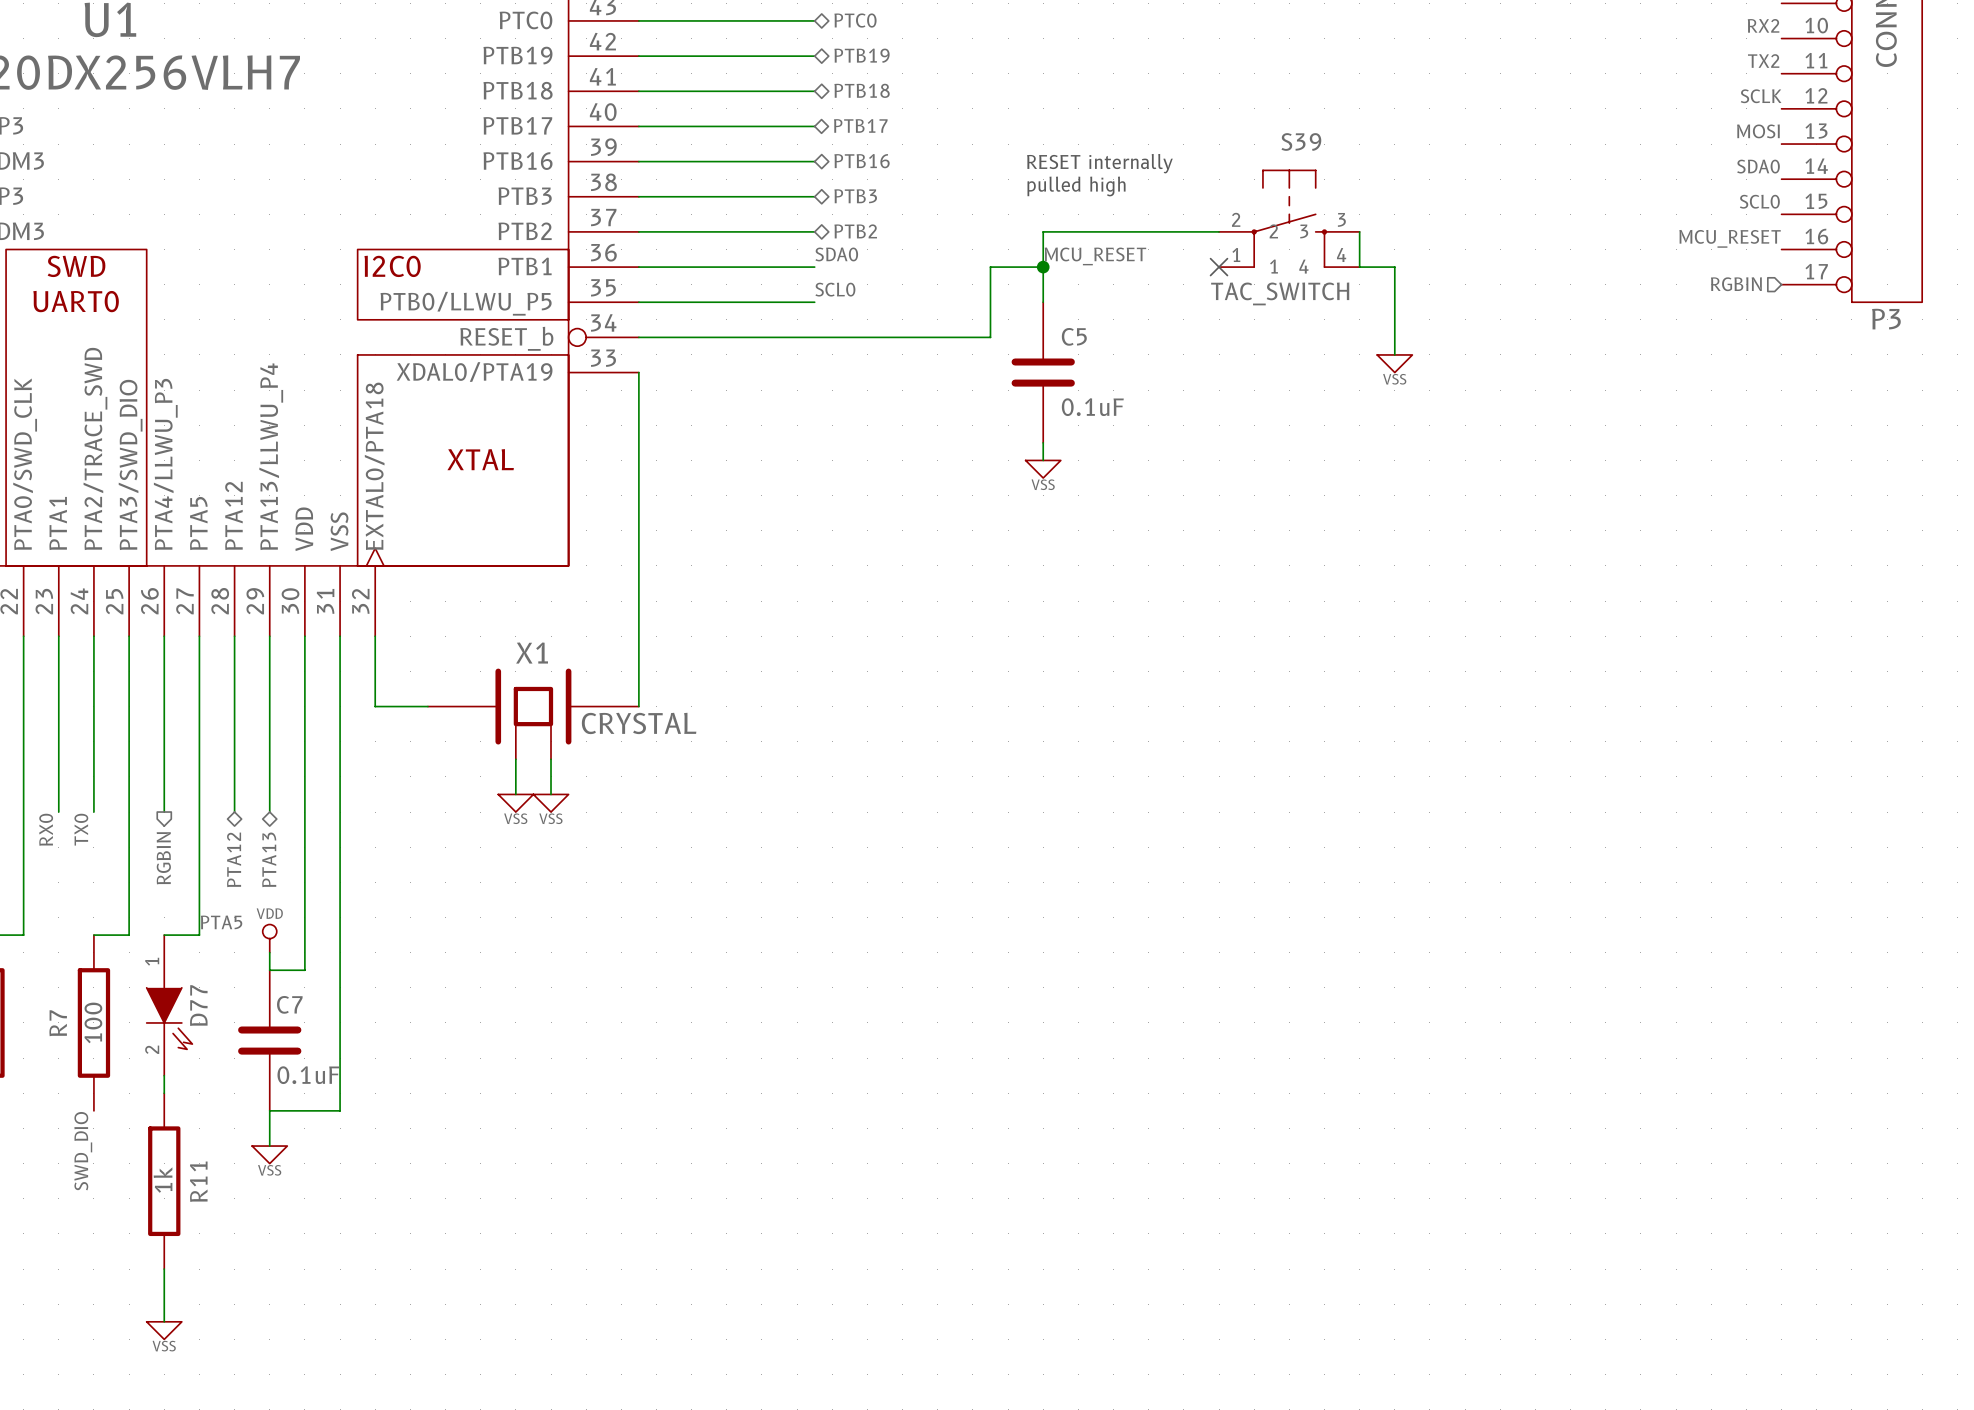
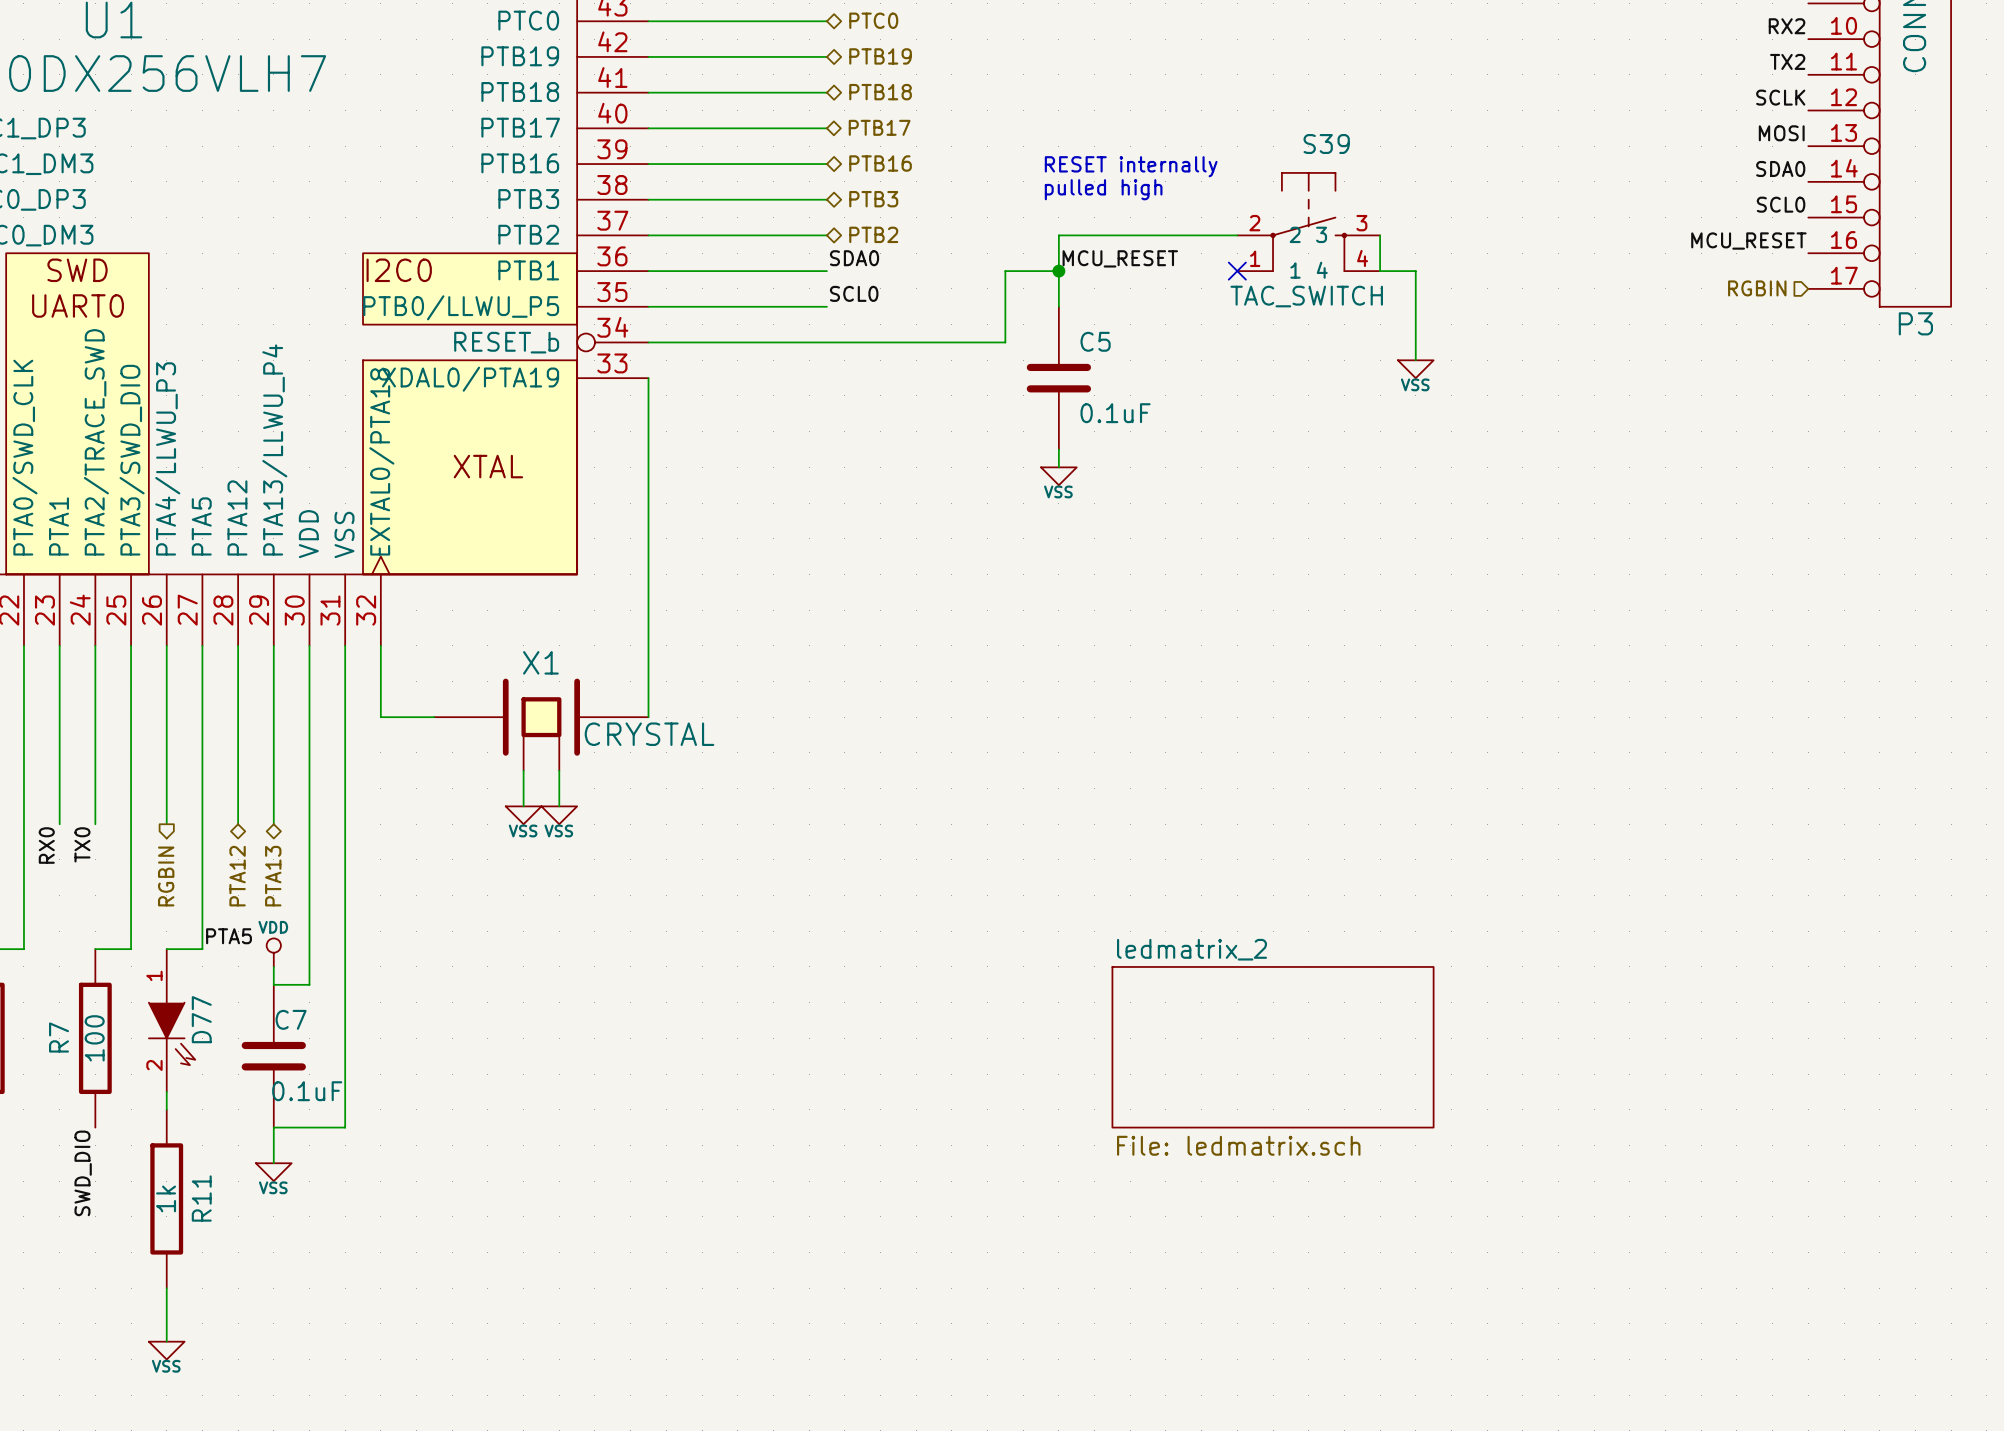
sheet ledmatrix_2: none -> File: ledmatrix.sch (1273, 1047)

